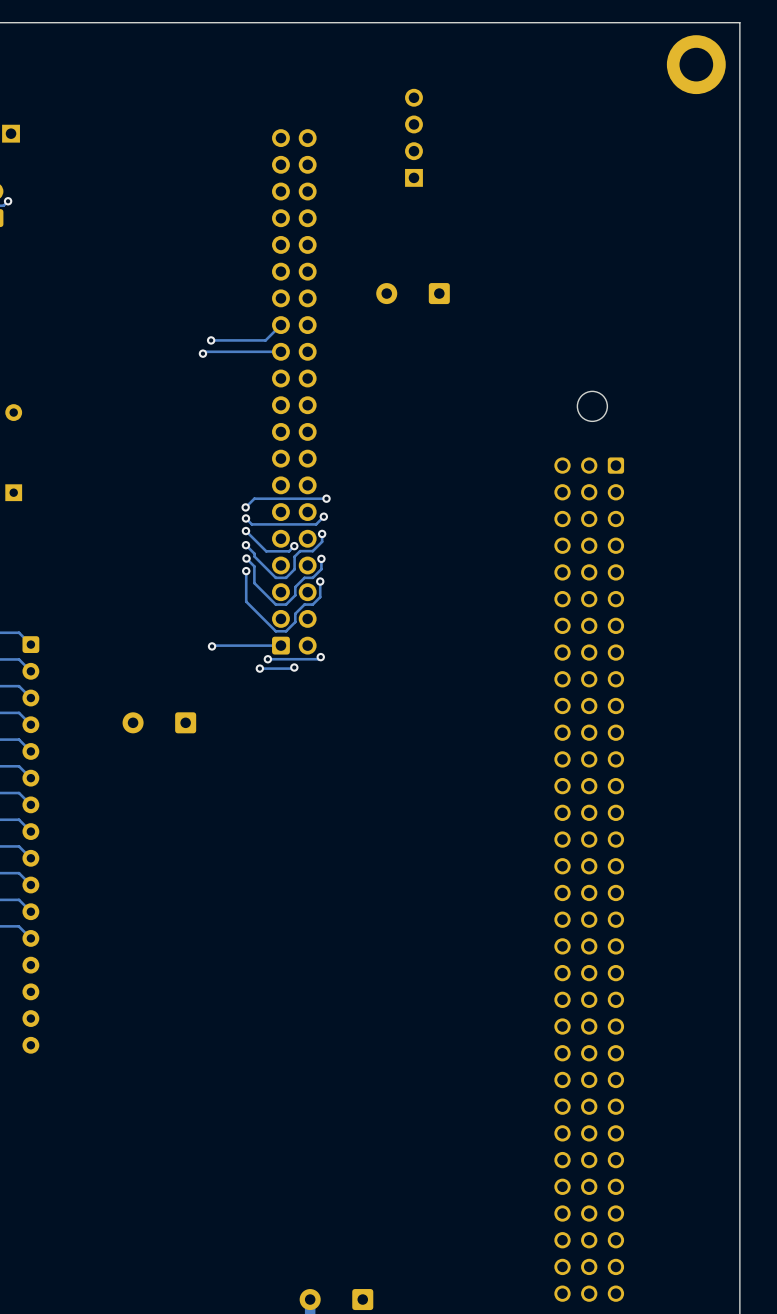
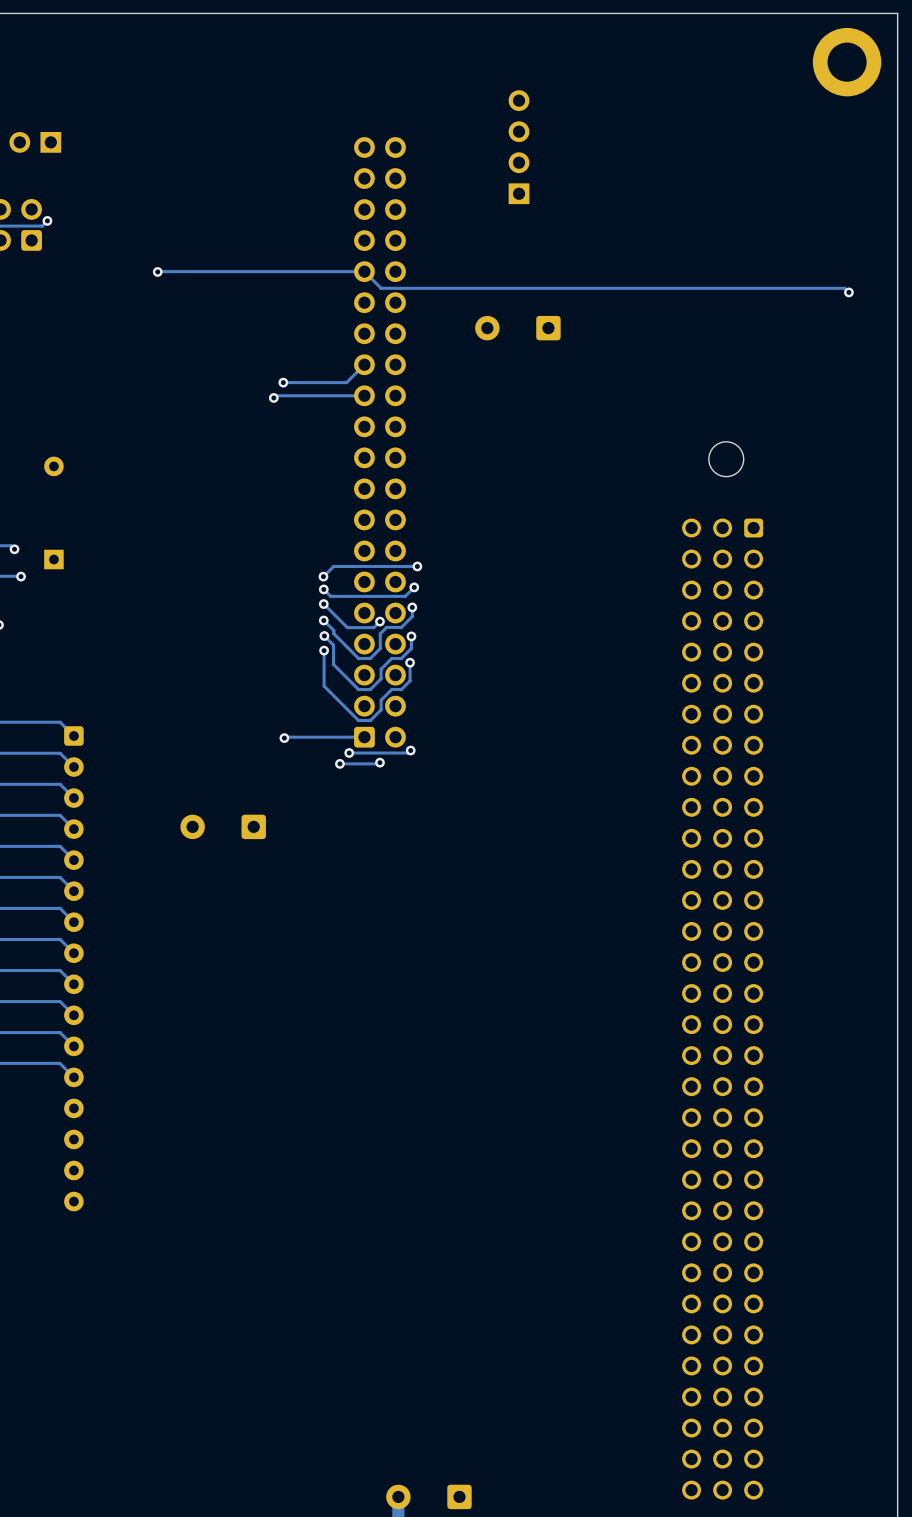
track: none -> (157, 271) (364, 271) (381, 288) (844, 288) (848, 292)
via: none -> (157, 271)
via: none -> (848, 292)

